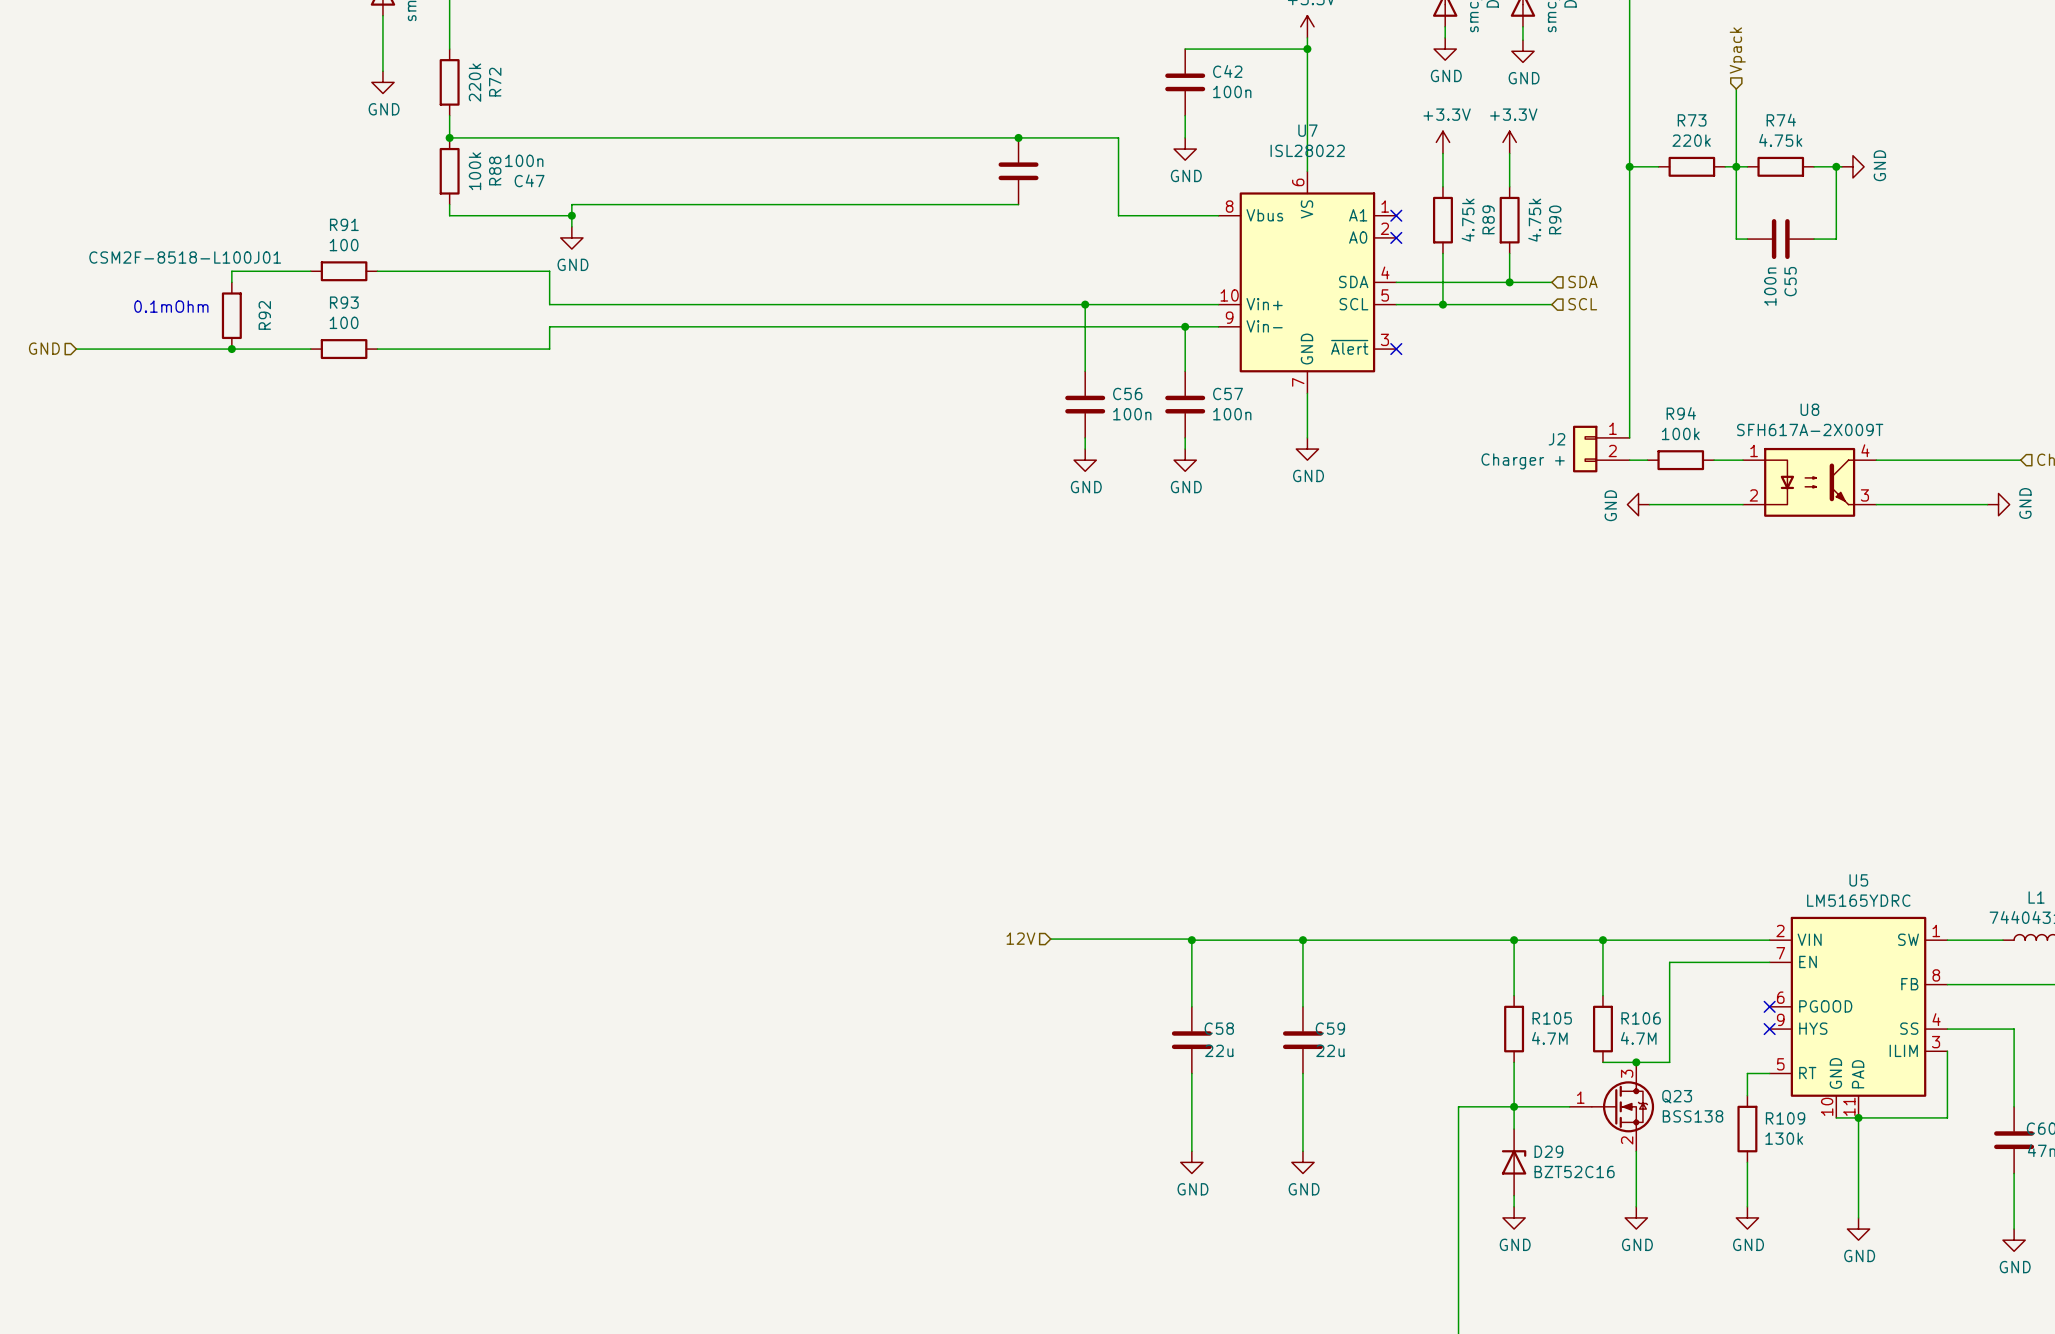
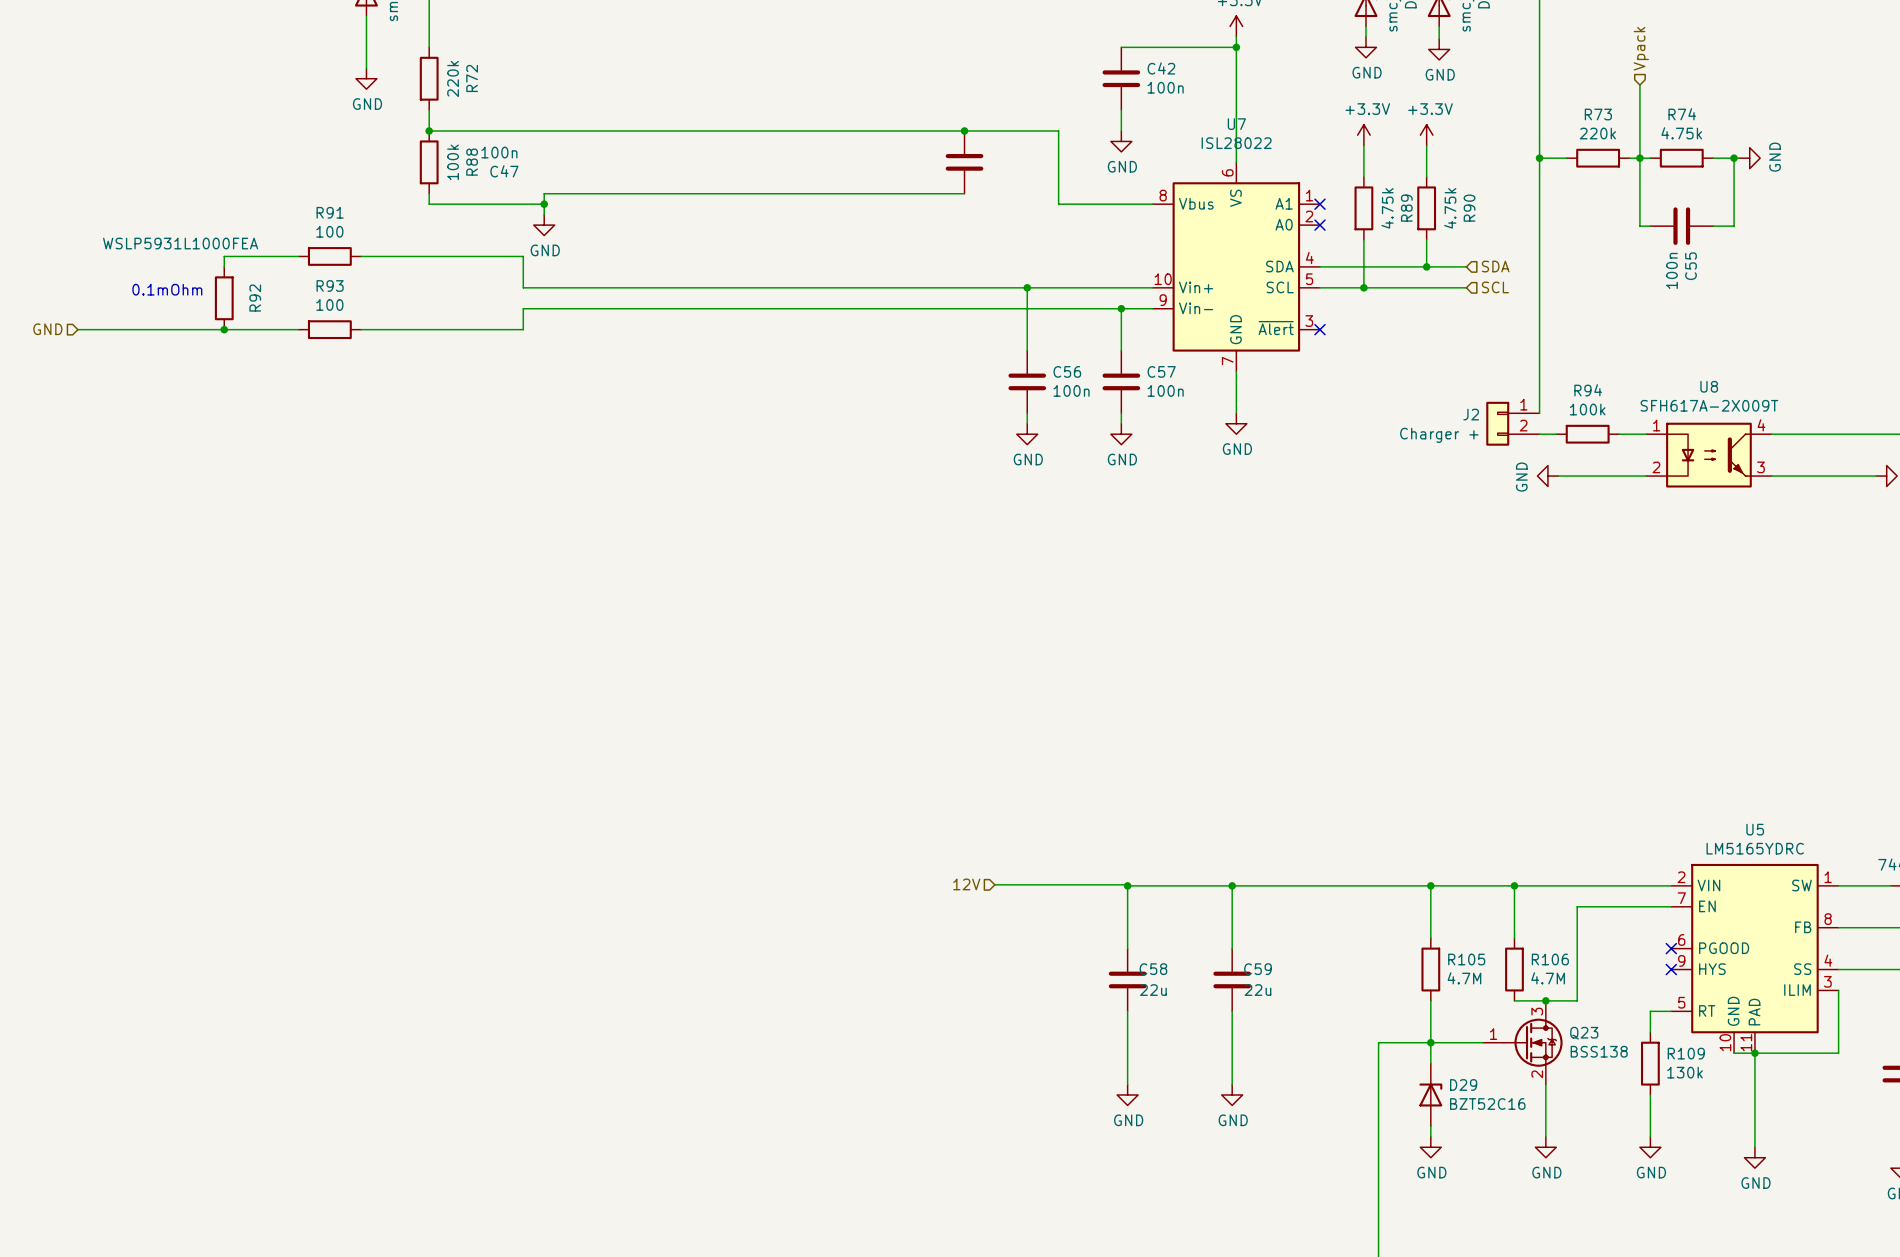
R92 value: CSM2F-8518-L100J01 (185, 257) -> WSLP5931L1000FEA (180, 243)

